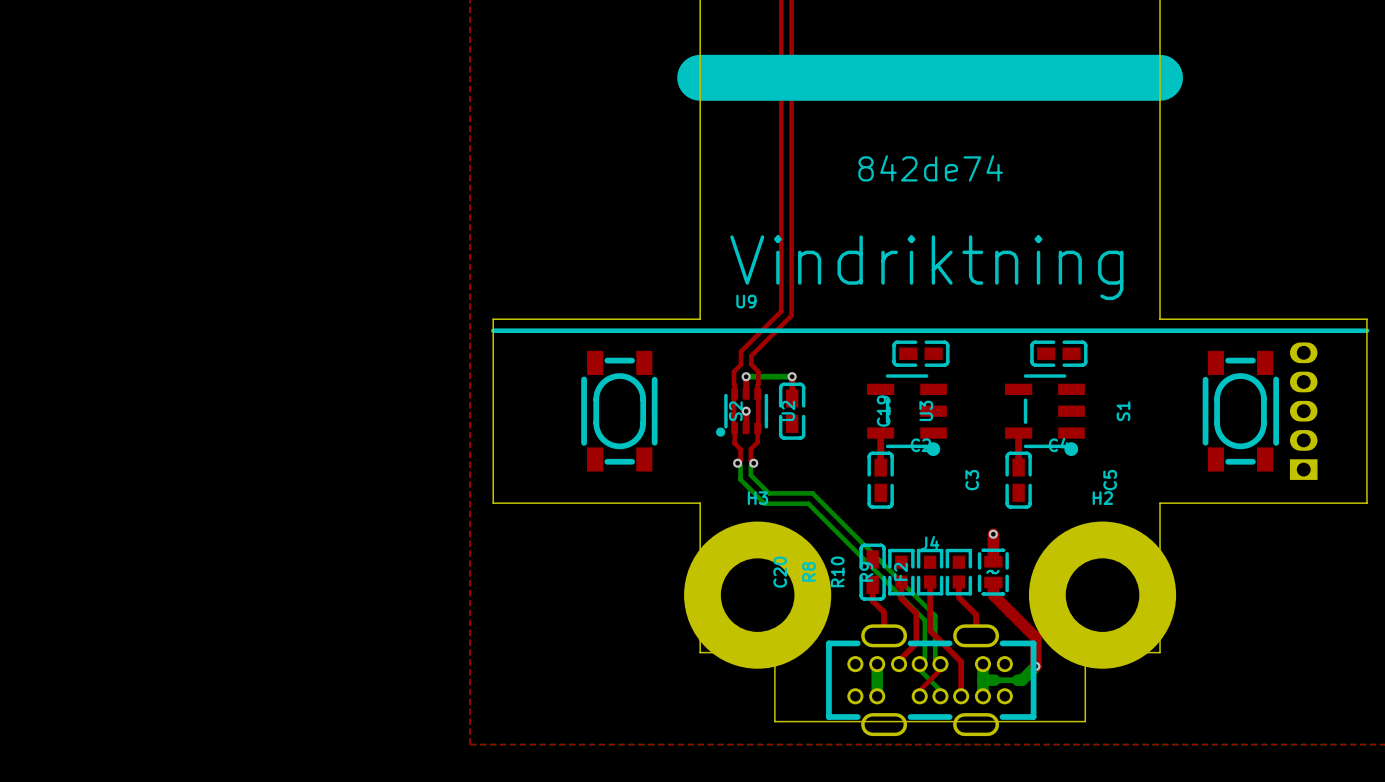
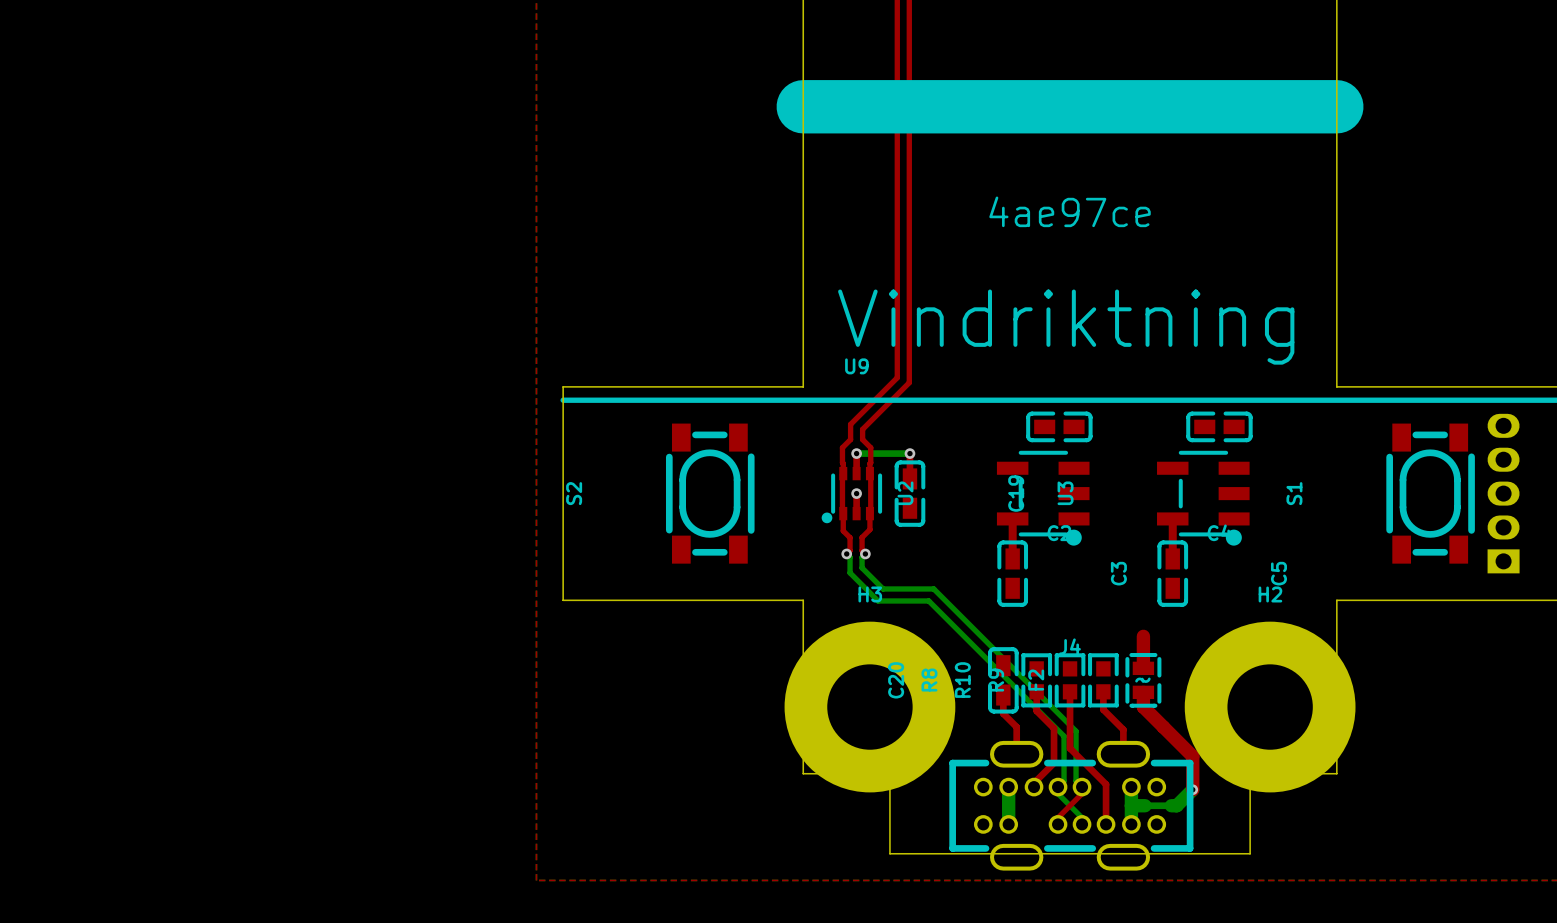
text: 842de74 (930, 168) -> 4ae97ce (1070, 211)
S2 rotation: 0° (619, 411) -> 180° (710, 493)
via: (993, 534) -> none

